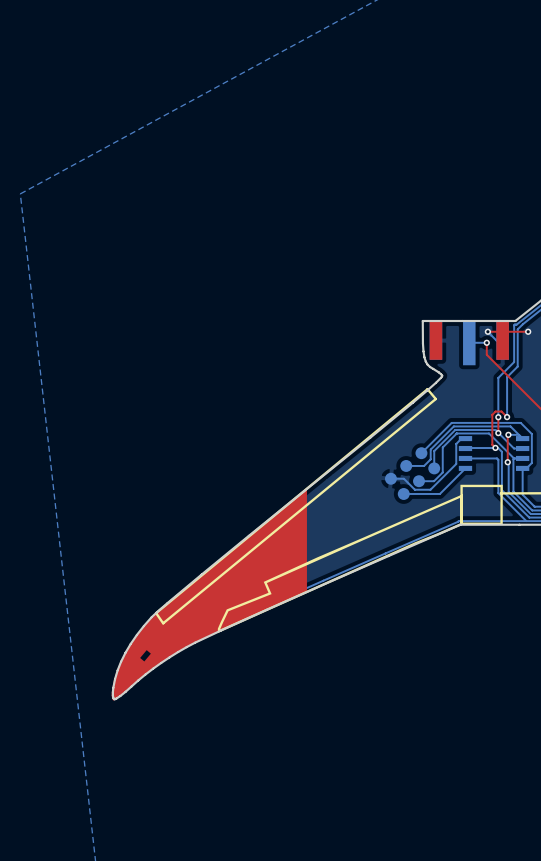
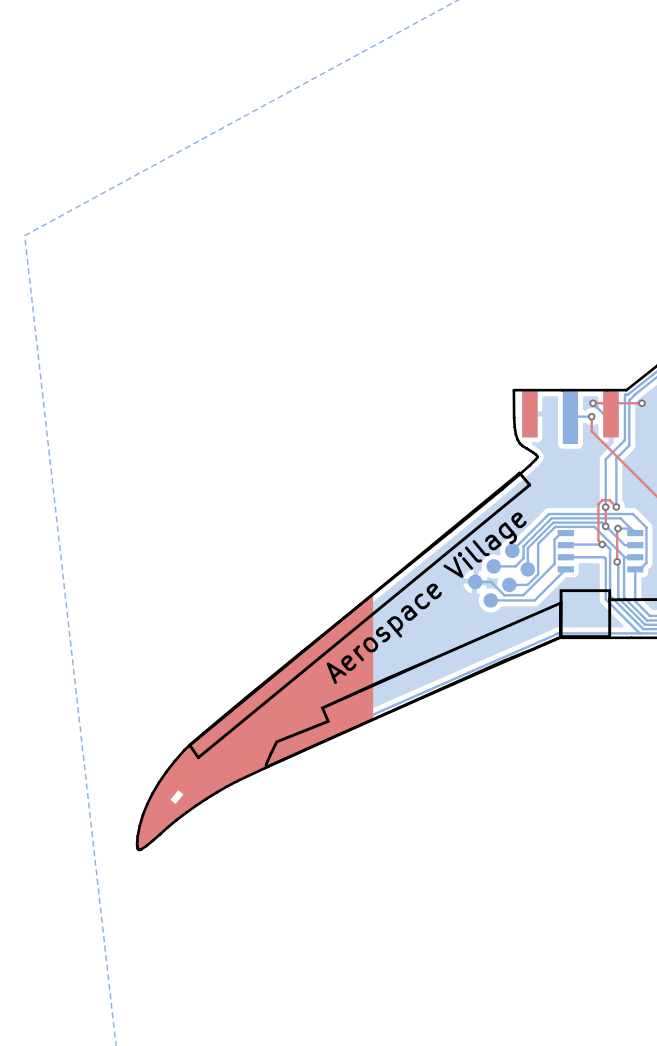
text: none -> Aerospace Village (426, 598)

